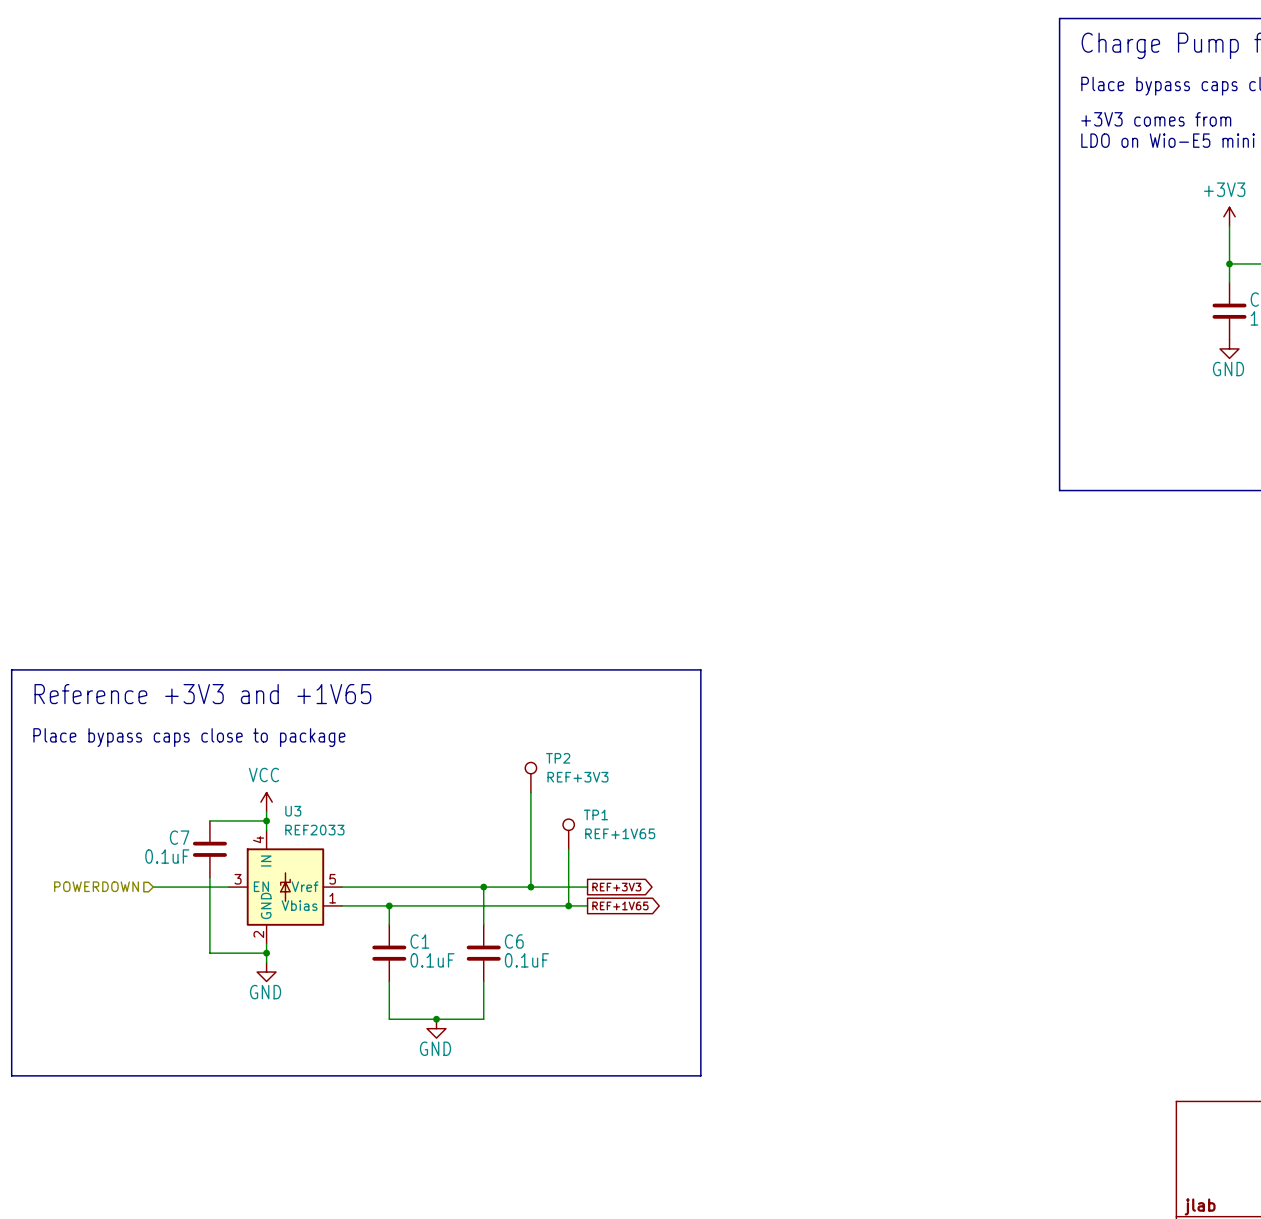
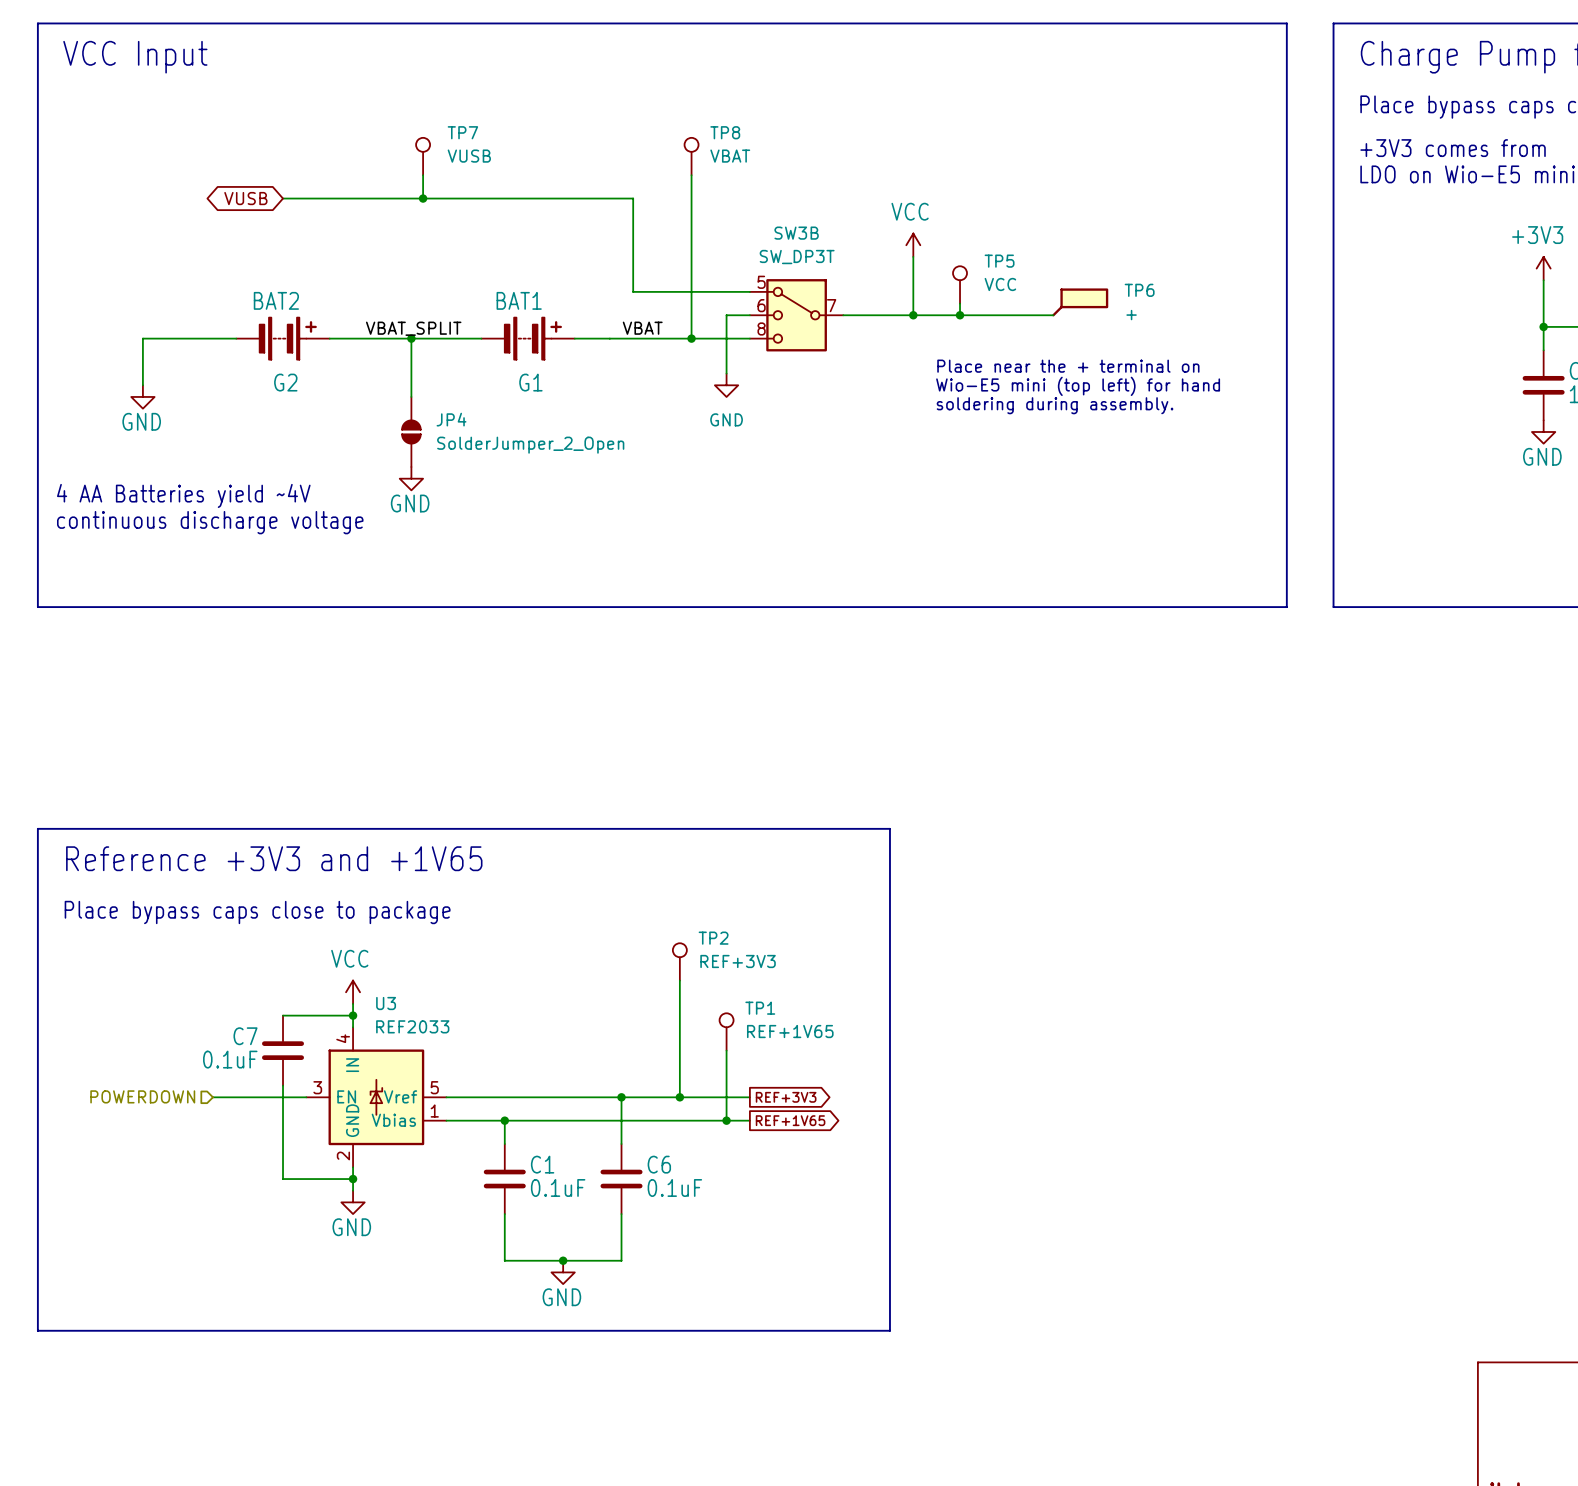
line: none -> (37, 23) (1286, 23) (1286, 607) (37, 607) (37, 23)
text: none -> VCC Input (135, 57)
TP7: none -> VUSB (423, 156)
TP8: none -> VBAT (691, 156)
wire: none -> (423, 175) (423, 198)
wire: none -> (691, 175) (691, 338)
global label: none -> VUSB (245, 198)
wire: none -> (283, 198) (633, 198) (633, 291) (749, 291)
junction: none -> (423, 198)
power symbol: none -> VCC (913, 245)
wire: none -> (913, 256) (913, 315)
TP5: none -> VCC (960, 284)
TP6: none -> + (1080, 302)
wire: none -> (960, 303) (960, 315)
wire: none -> (749, 315) (726, 315) (726, 373)
SW3B: none -> SW_DP3T (796, 315)
wire: none -> (843, 315) (1053, 315)
junction: none -> (913, 315)
junction: none -> (960, 315)
label: none -> VBAT_SPLIT (413, 328)
label: none -> VBAT (642, 328)
wire: none -> (236, 338) (142, 338) (142, 385)
G2: none -> BAT2 (283, 338)
wire: none -> (329, 338) (481, 338)
wire: none -> (411, 338) (411, 396)
junction: none -> (411, 338)
G1: none -> BAT1 (528, 338)
wire: none -> (574, 338) (749, 338)
junction: none -> (691, 338)
text: none -> Place near the + terminal on (1068, 366)
power symbol: none -> GND (726, 385)
text: none -> Wio-E5 mini (top left) for hand (1078, 386)
power symbol: none -> GND (142, 396)
text: none -> soldering during assembly. (1055, 405)
JP4: none -> SolderJumper_2_Open (411, 431)
power symbol: none -> GND (411, 478)
text: none -> 4 AA Batteries yield ~4V (183, 495)
text: none -> continuous discharge voltage (210, 522)

